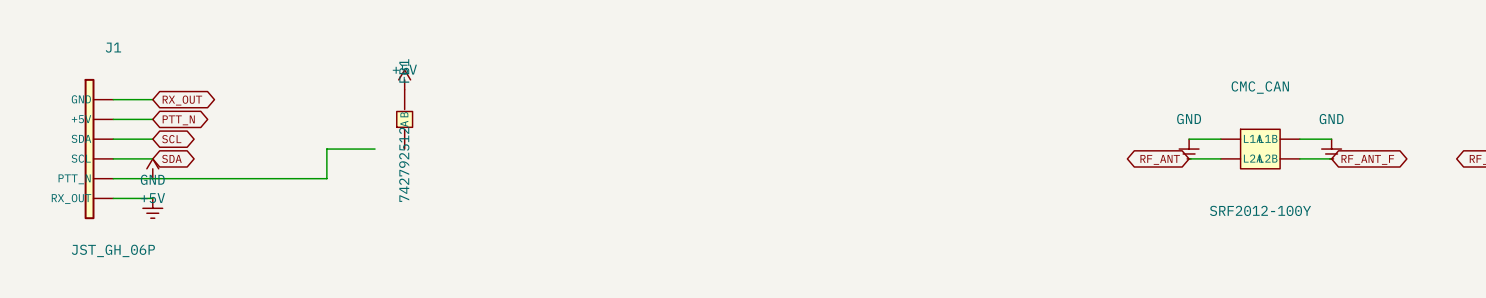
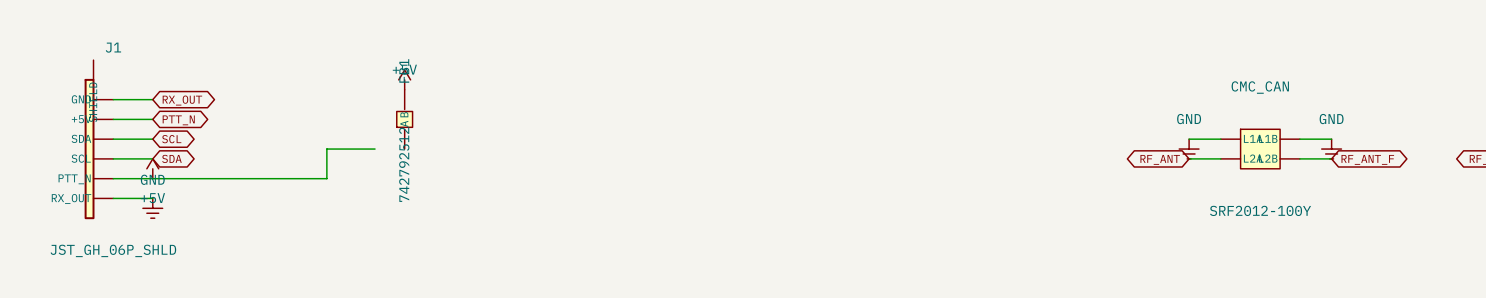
J1 symbol: [84, 78, 114, 220] -> [84, 60, 114, 220]
J1 value: JST_GH_06P (113, 250) -> JST_GH_06P_SHLD (113, 250)

